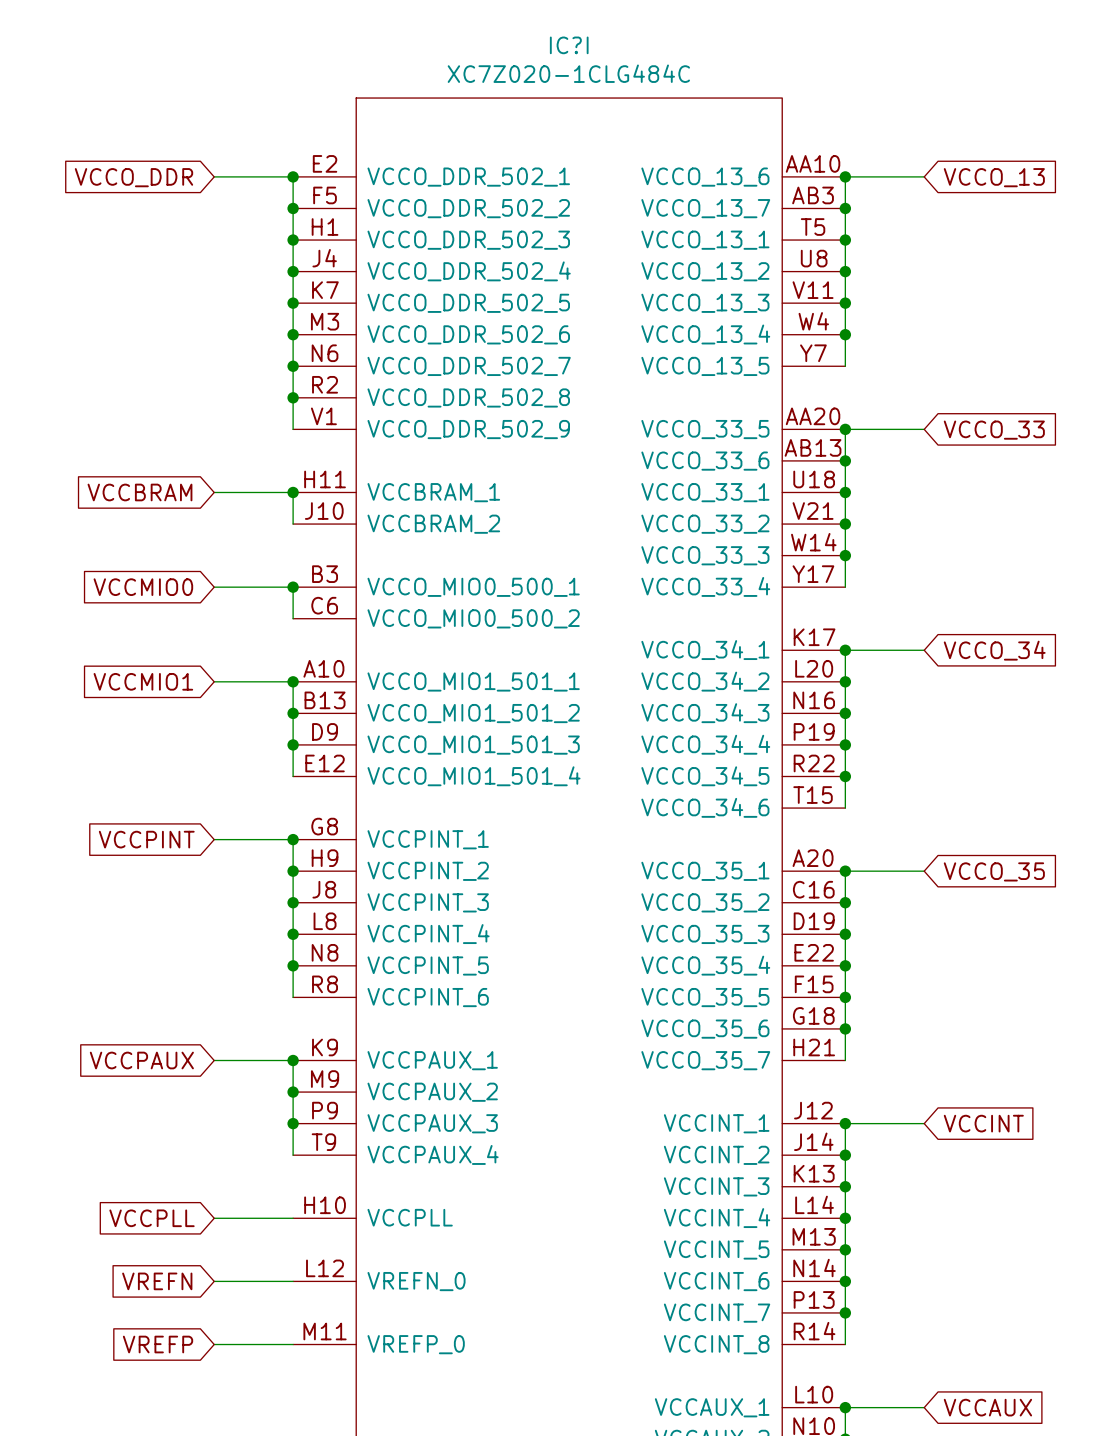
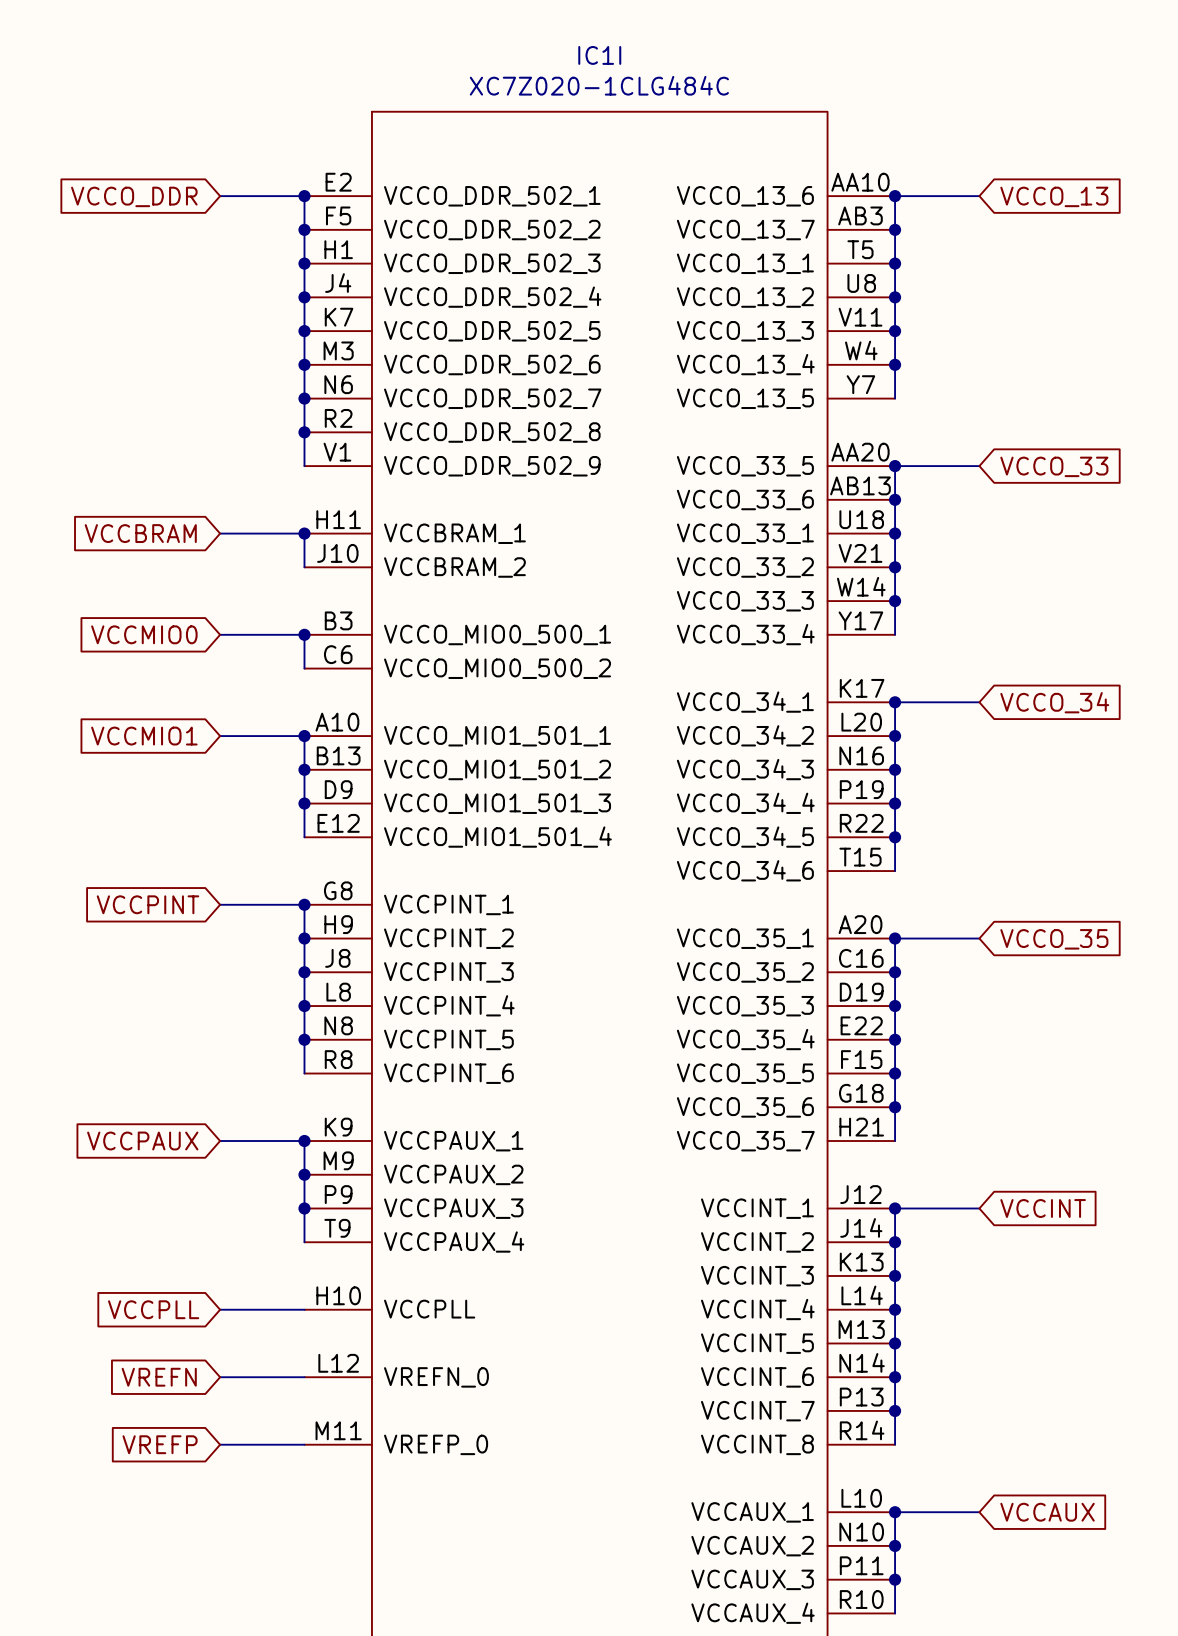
IC?I name: IC?I (569, 45) -> IC1I (599, 55)

